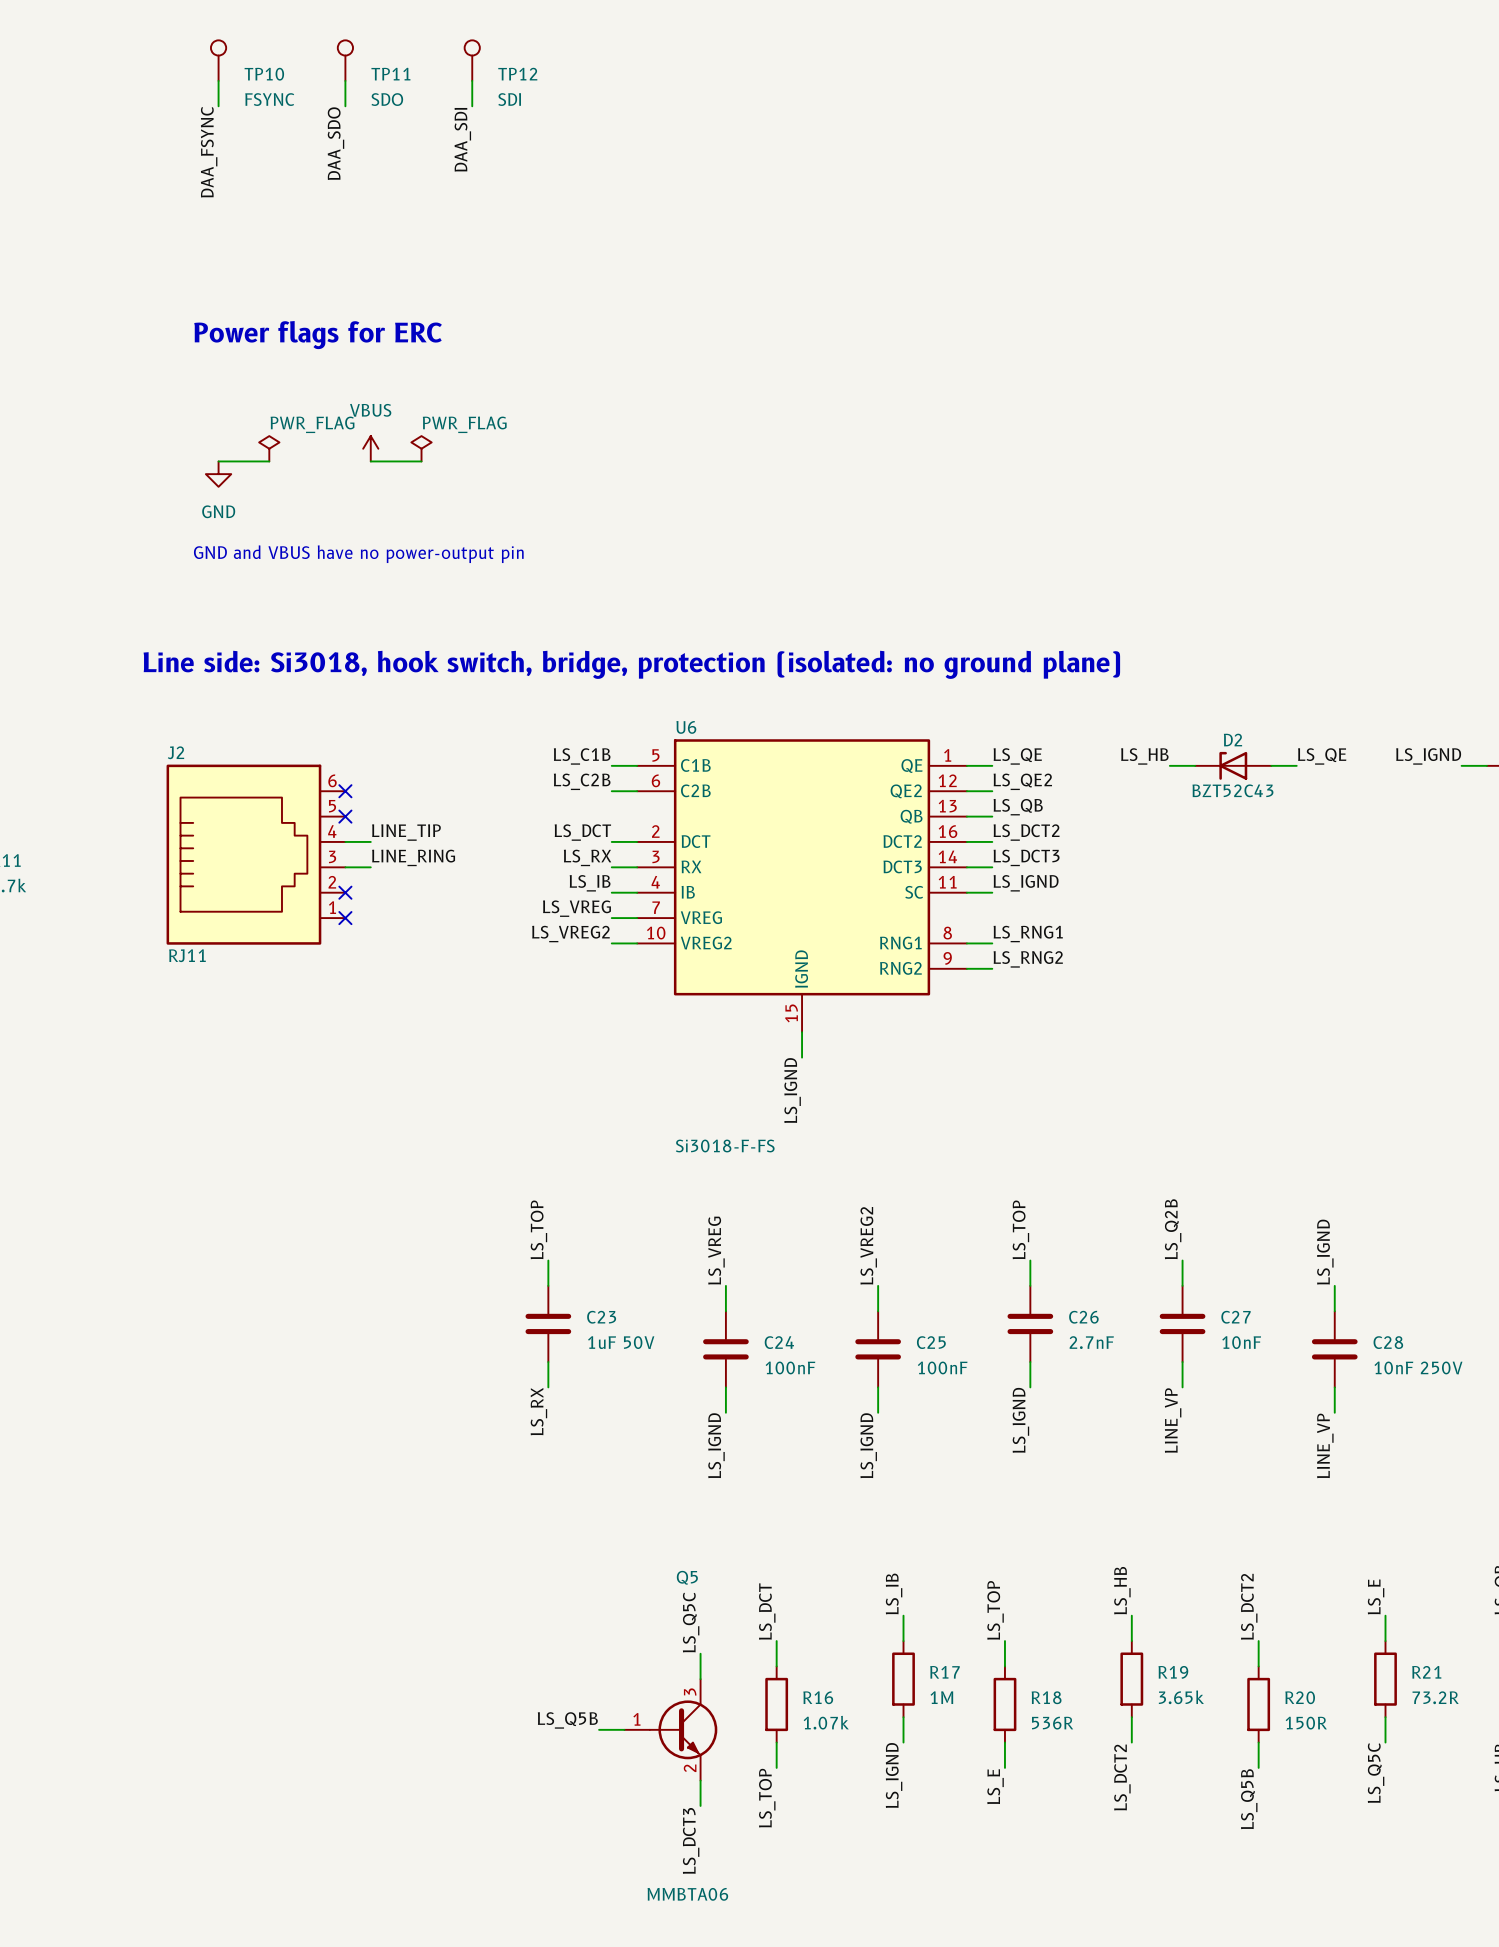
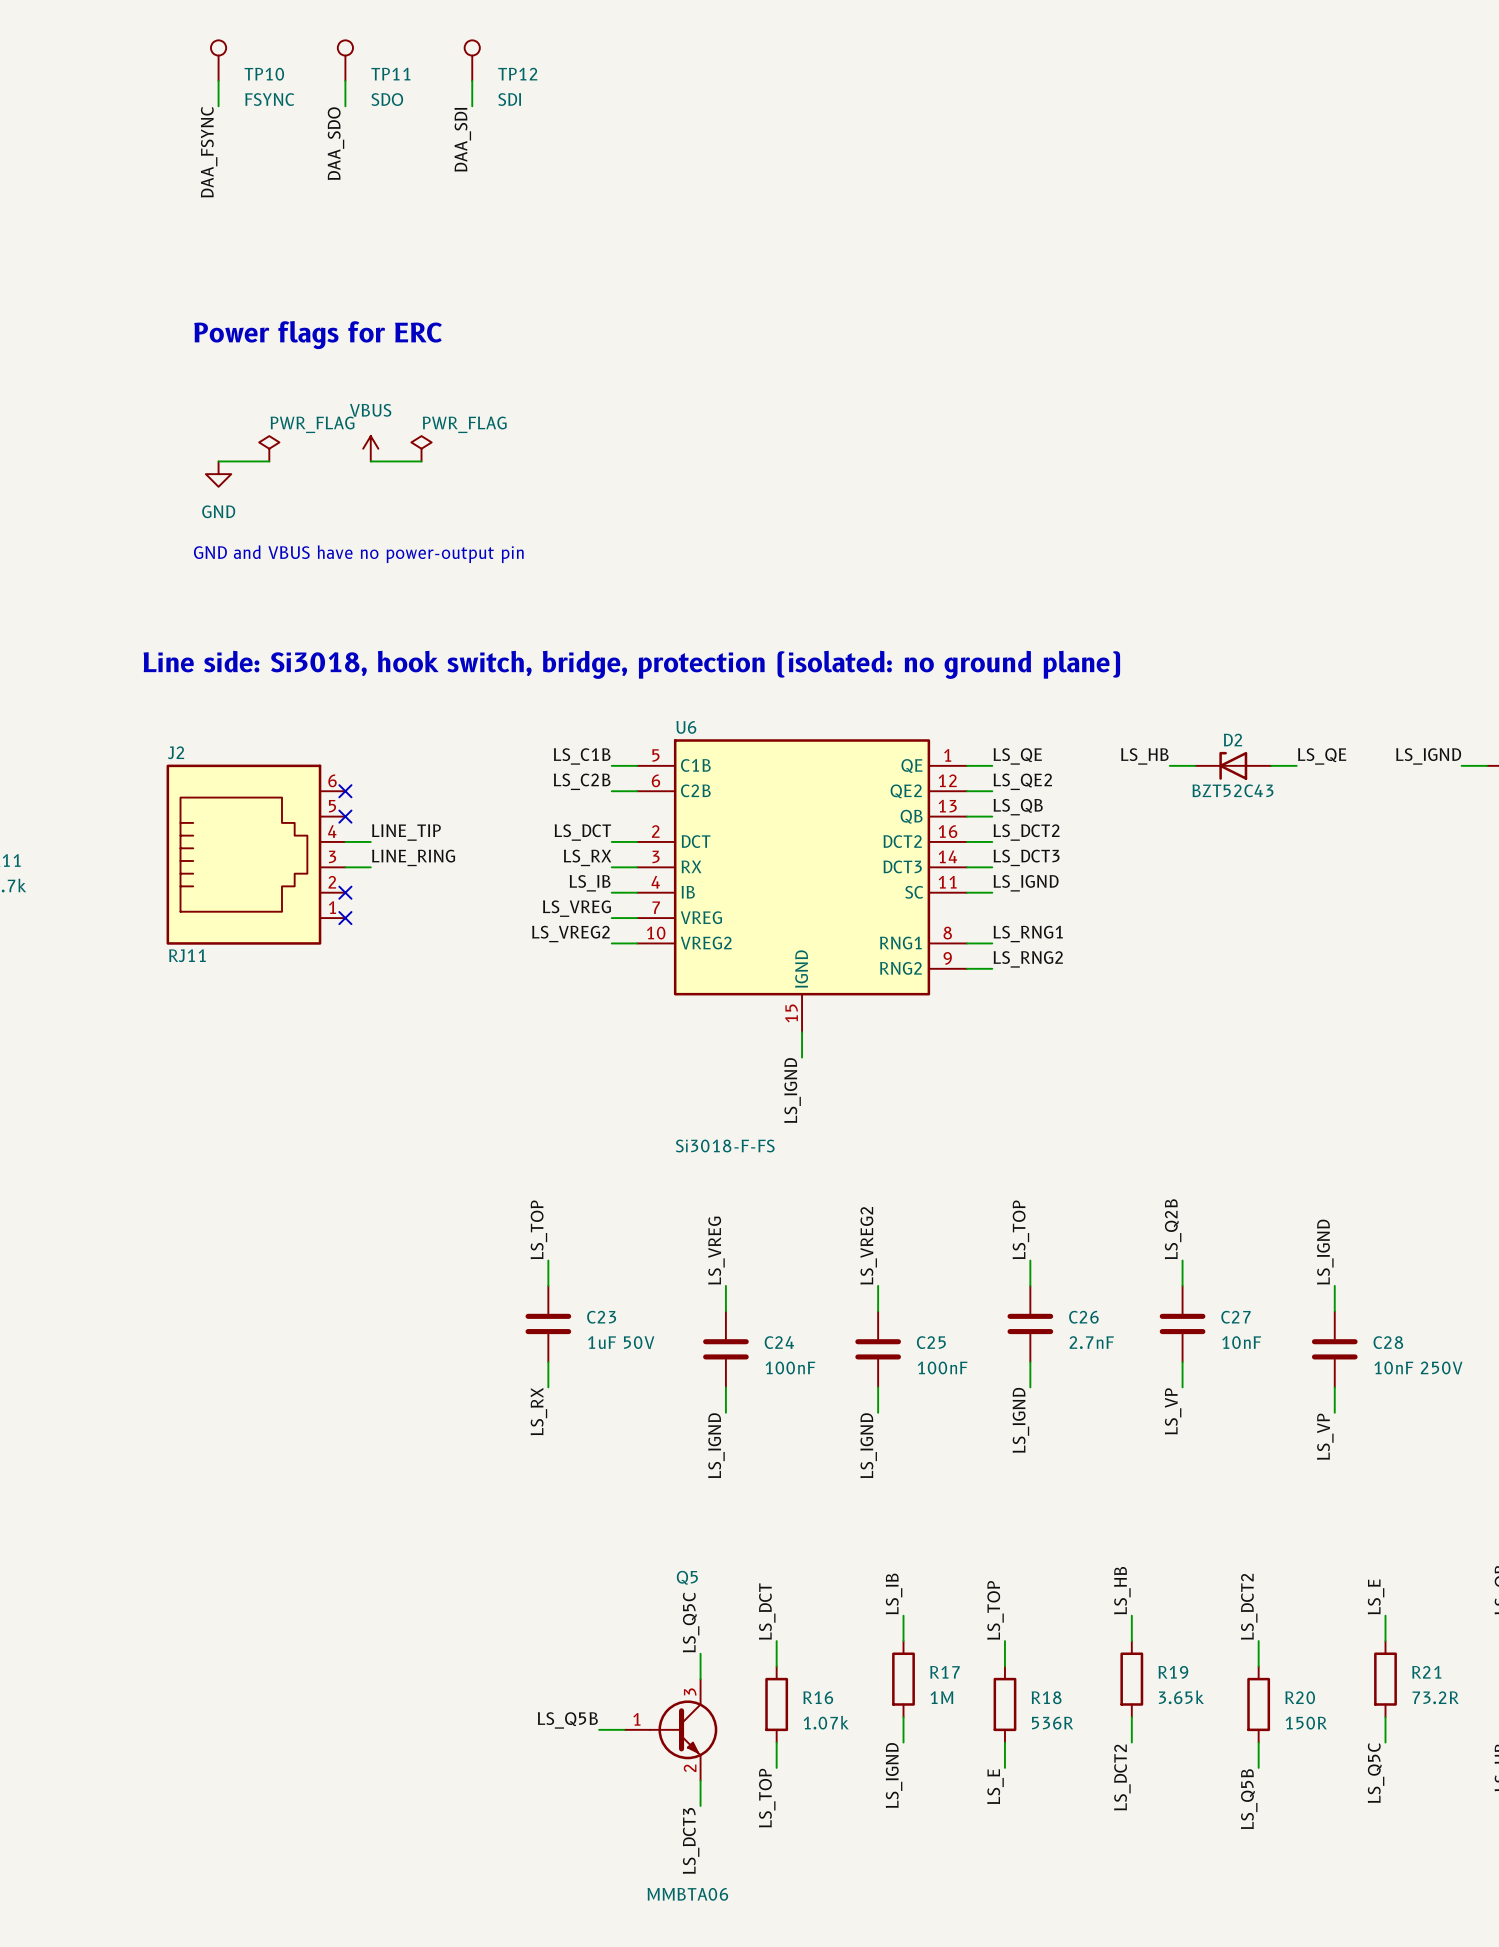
label: LINE_VP (1173, 1420) -> LS_VP (1173, 1411)
label: LINE_VP (1325, 1445) -> LS_VP (1325, 1436)

